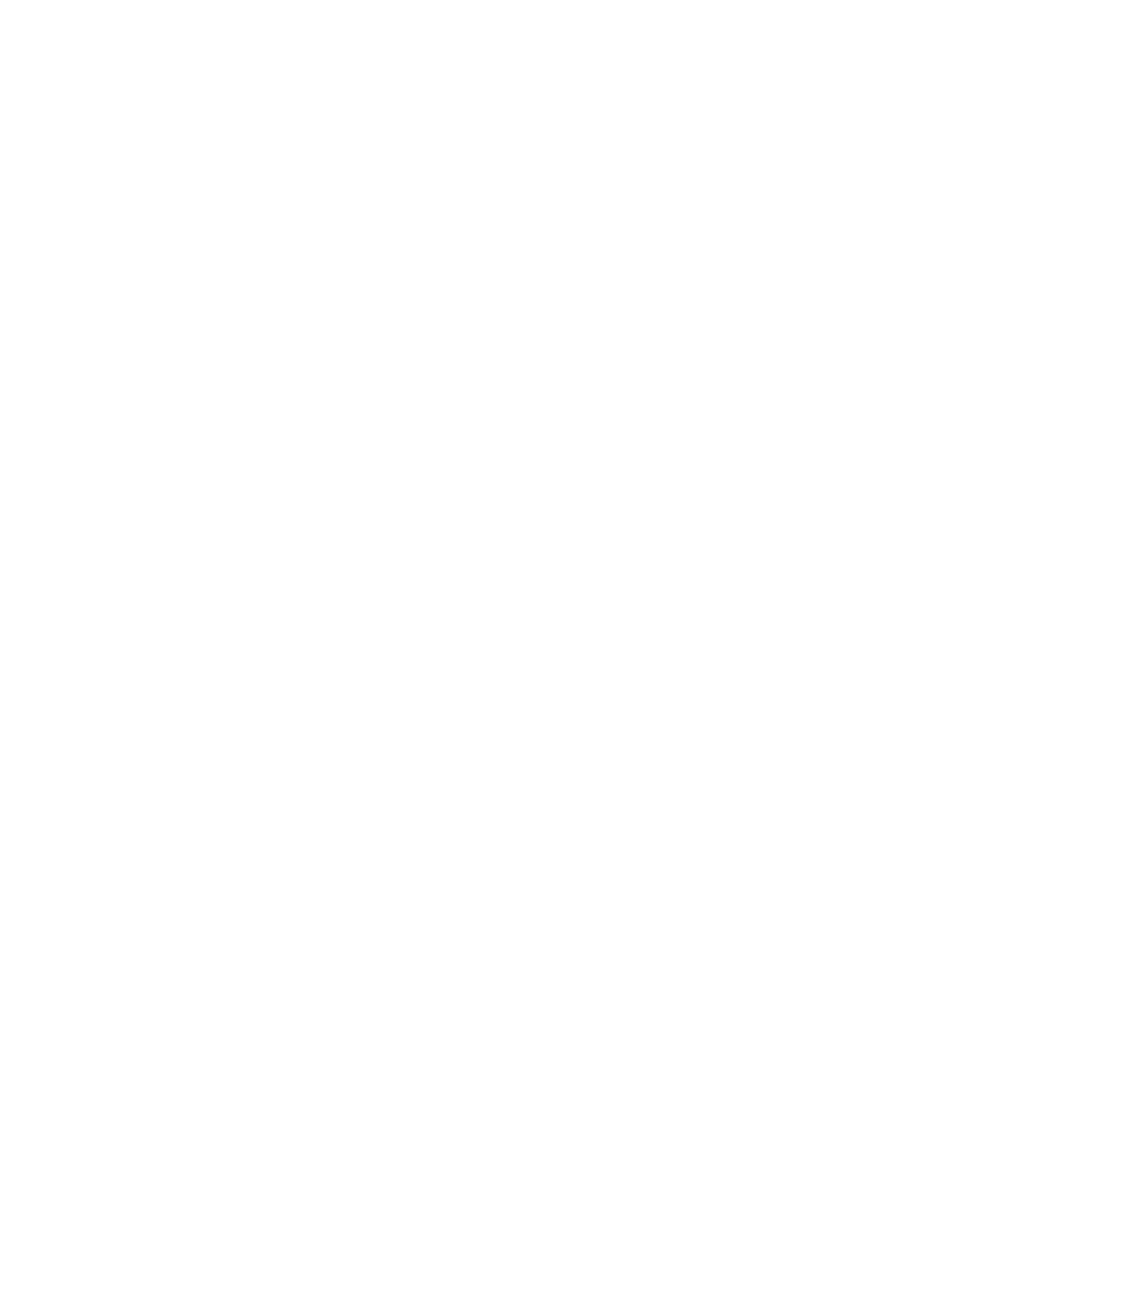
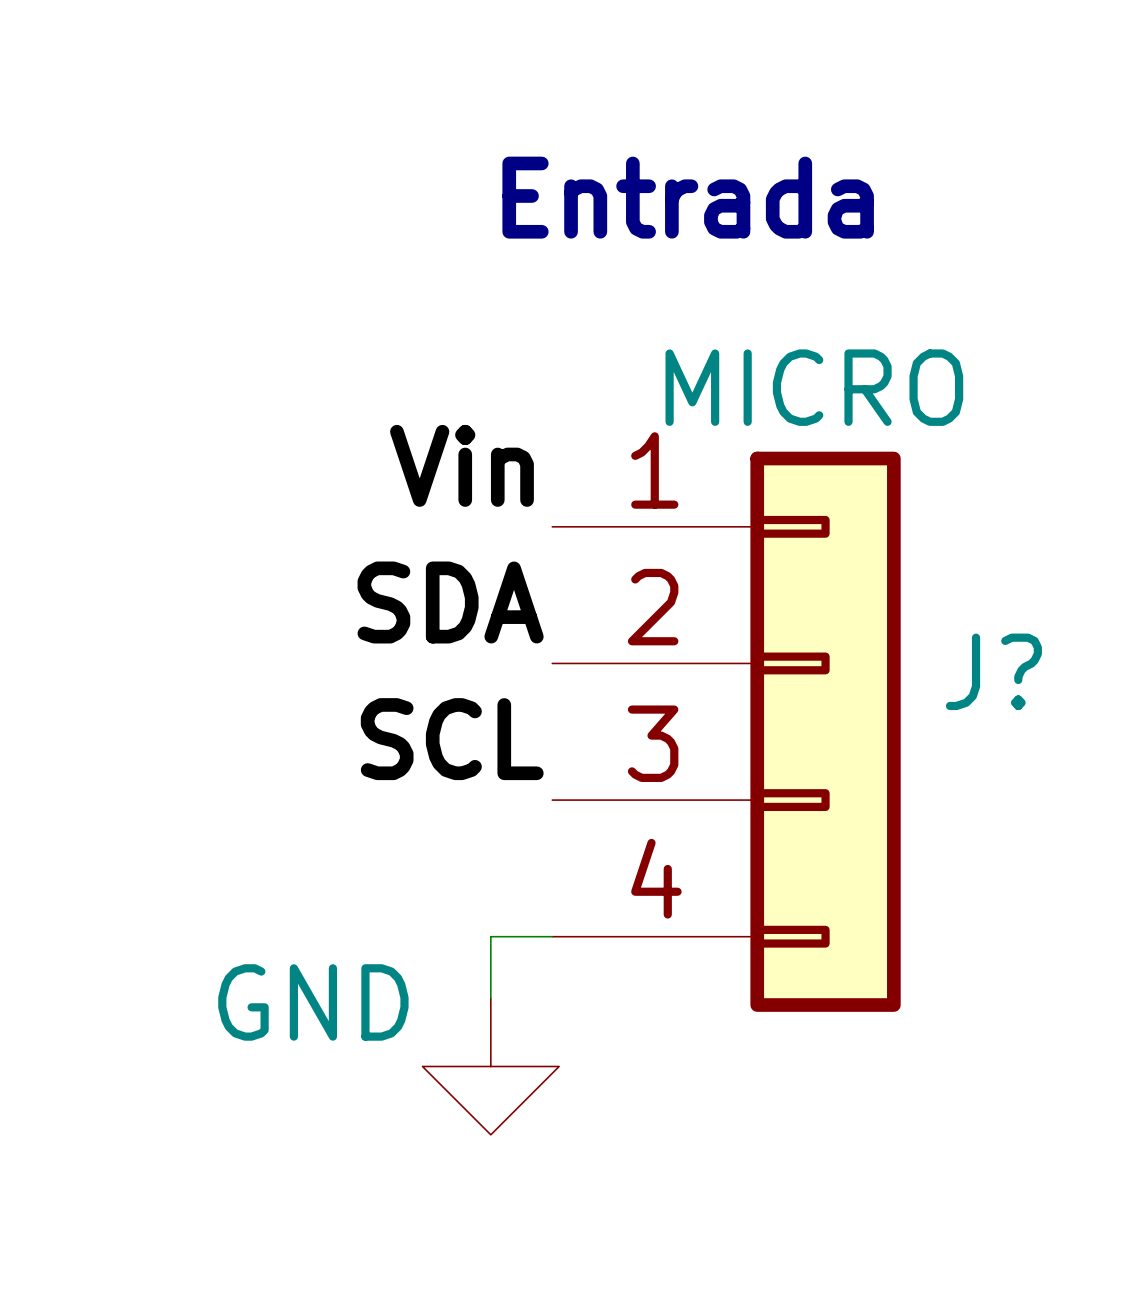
text: none -> Entrada (688, 197)
label: none -> Vin (461, 465)
label: none -> SDA (450, 602)
J?: none -> MICRO (726, 731)
label: none -> SCL (452, 739)
wire: none -> (552, 936) (490, 936) (490, 998)
power symbol: none -> GND (490, 1066)

